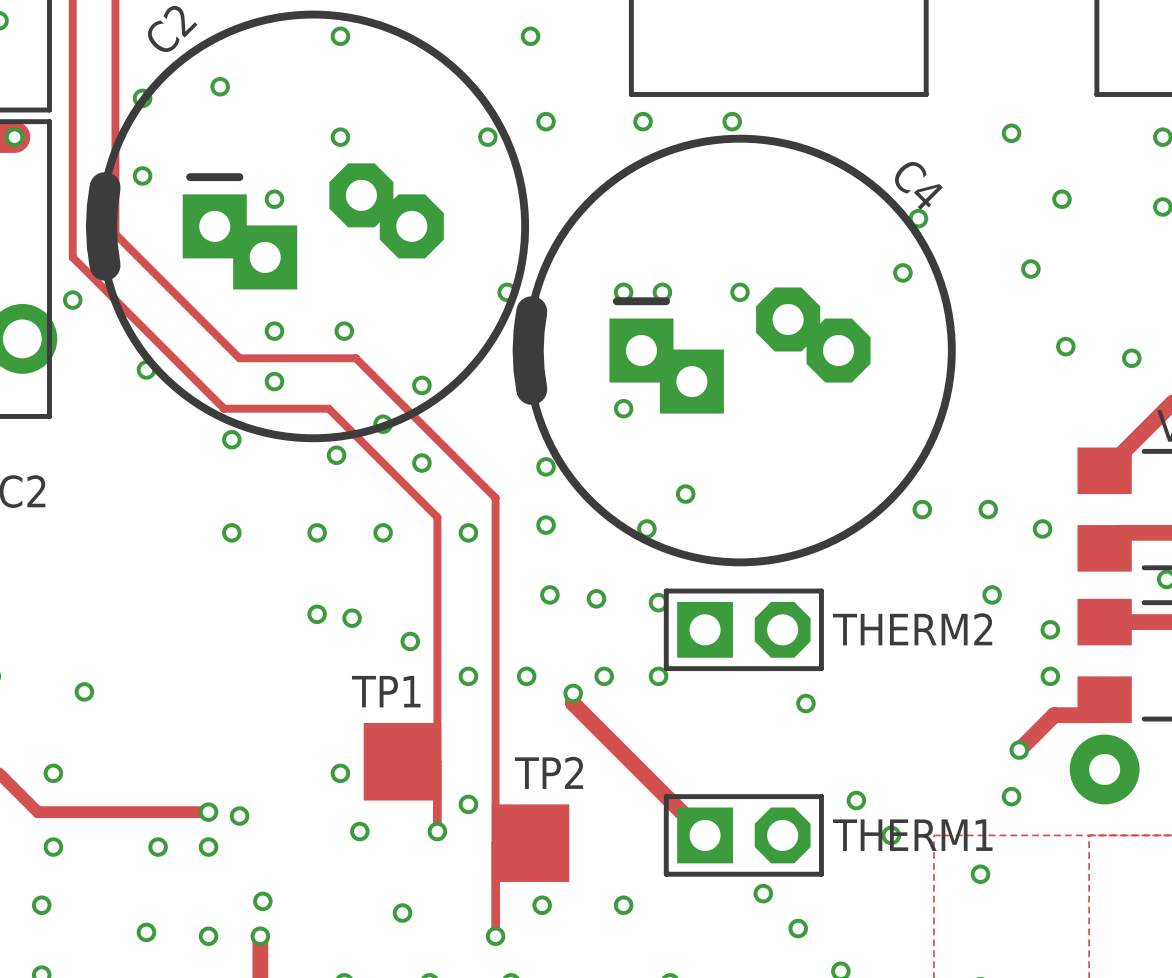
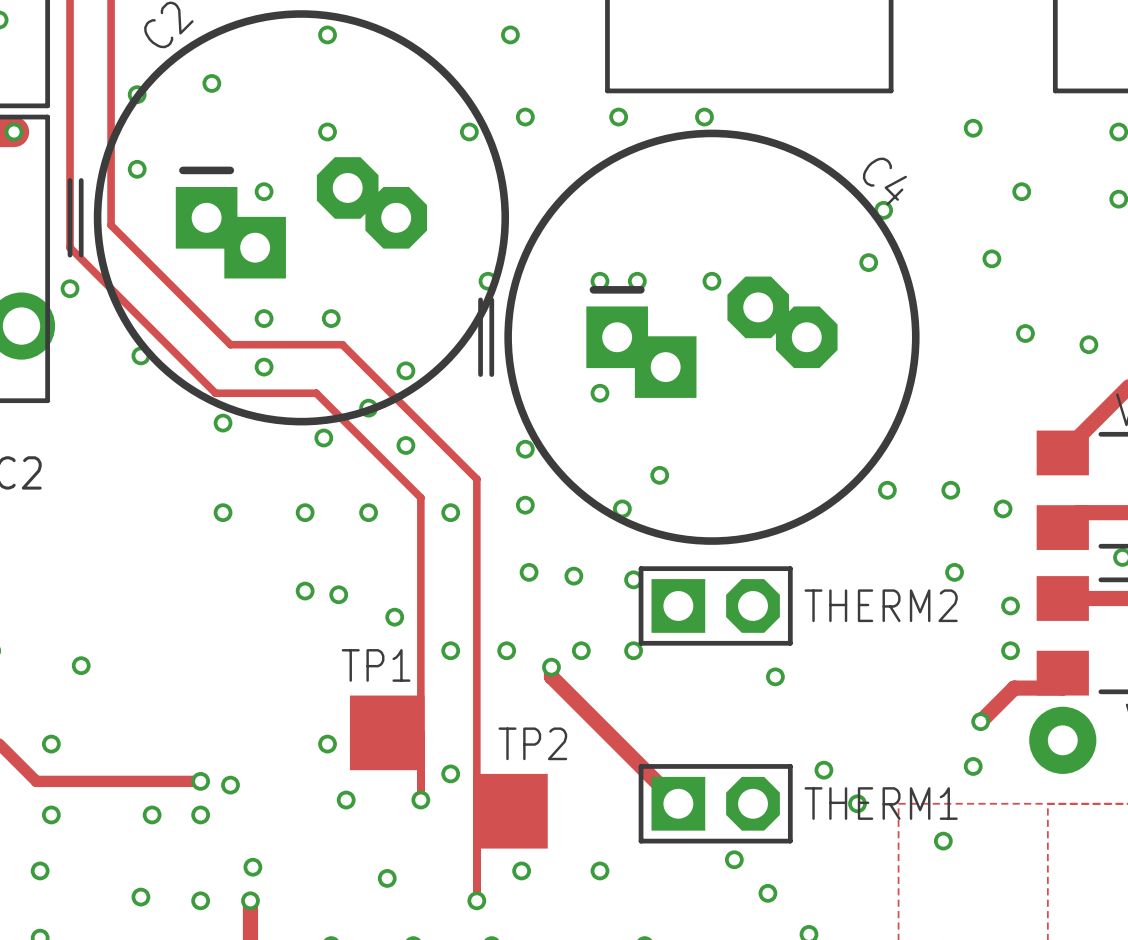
C2 footprint: [85, 10, 530, 443] -> [67, 10, 510, 426]
C4 footprint: [512, 134, 956, 567] -> [478, 129, 920, 545]

